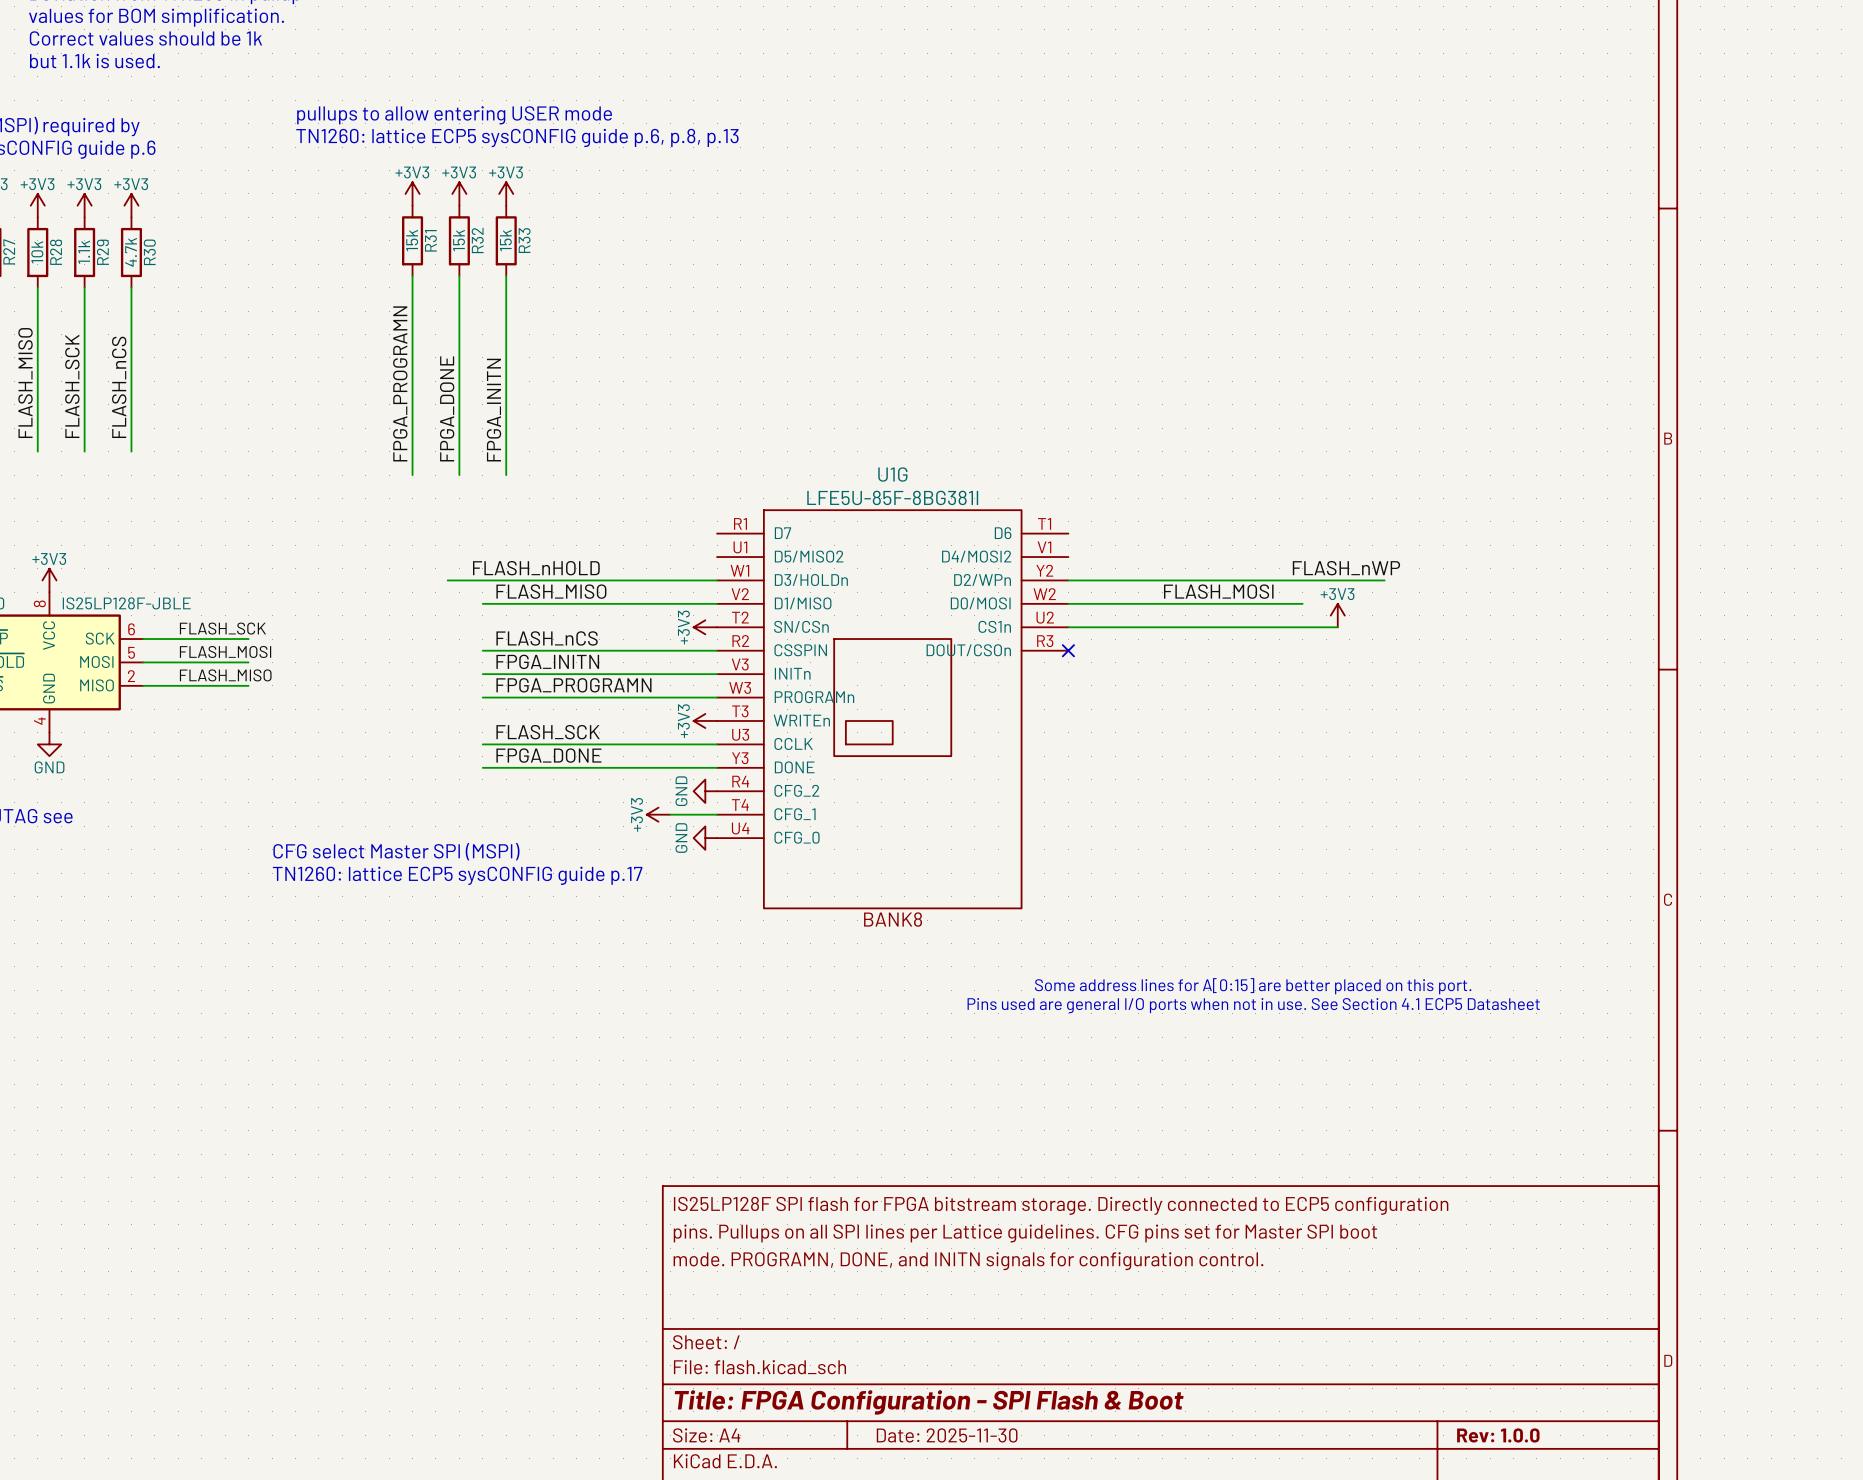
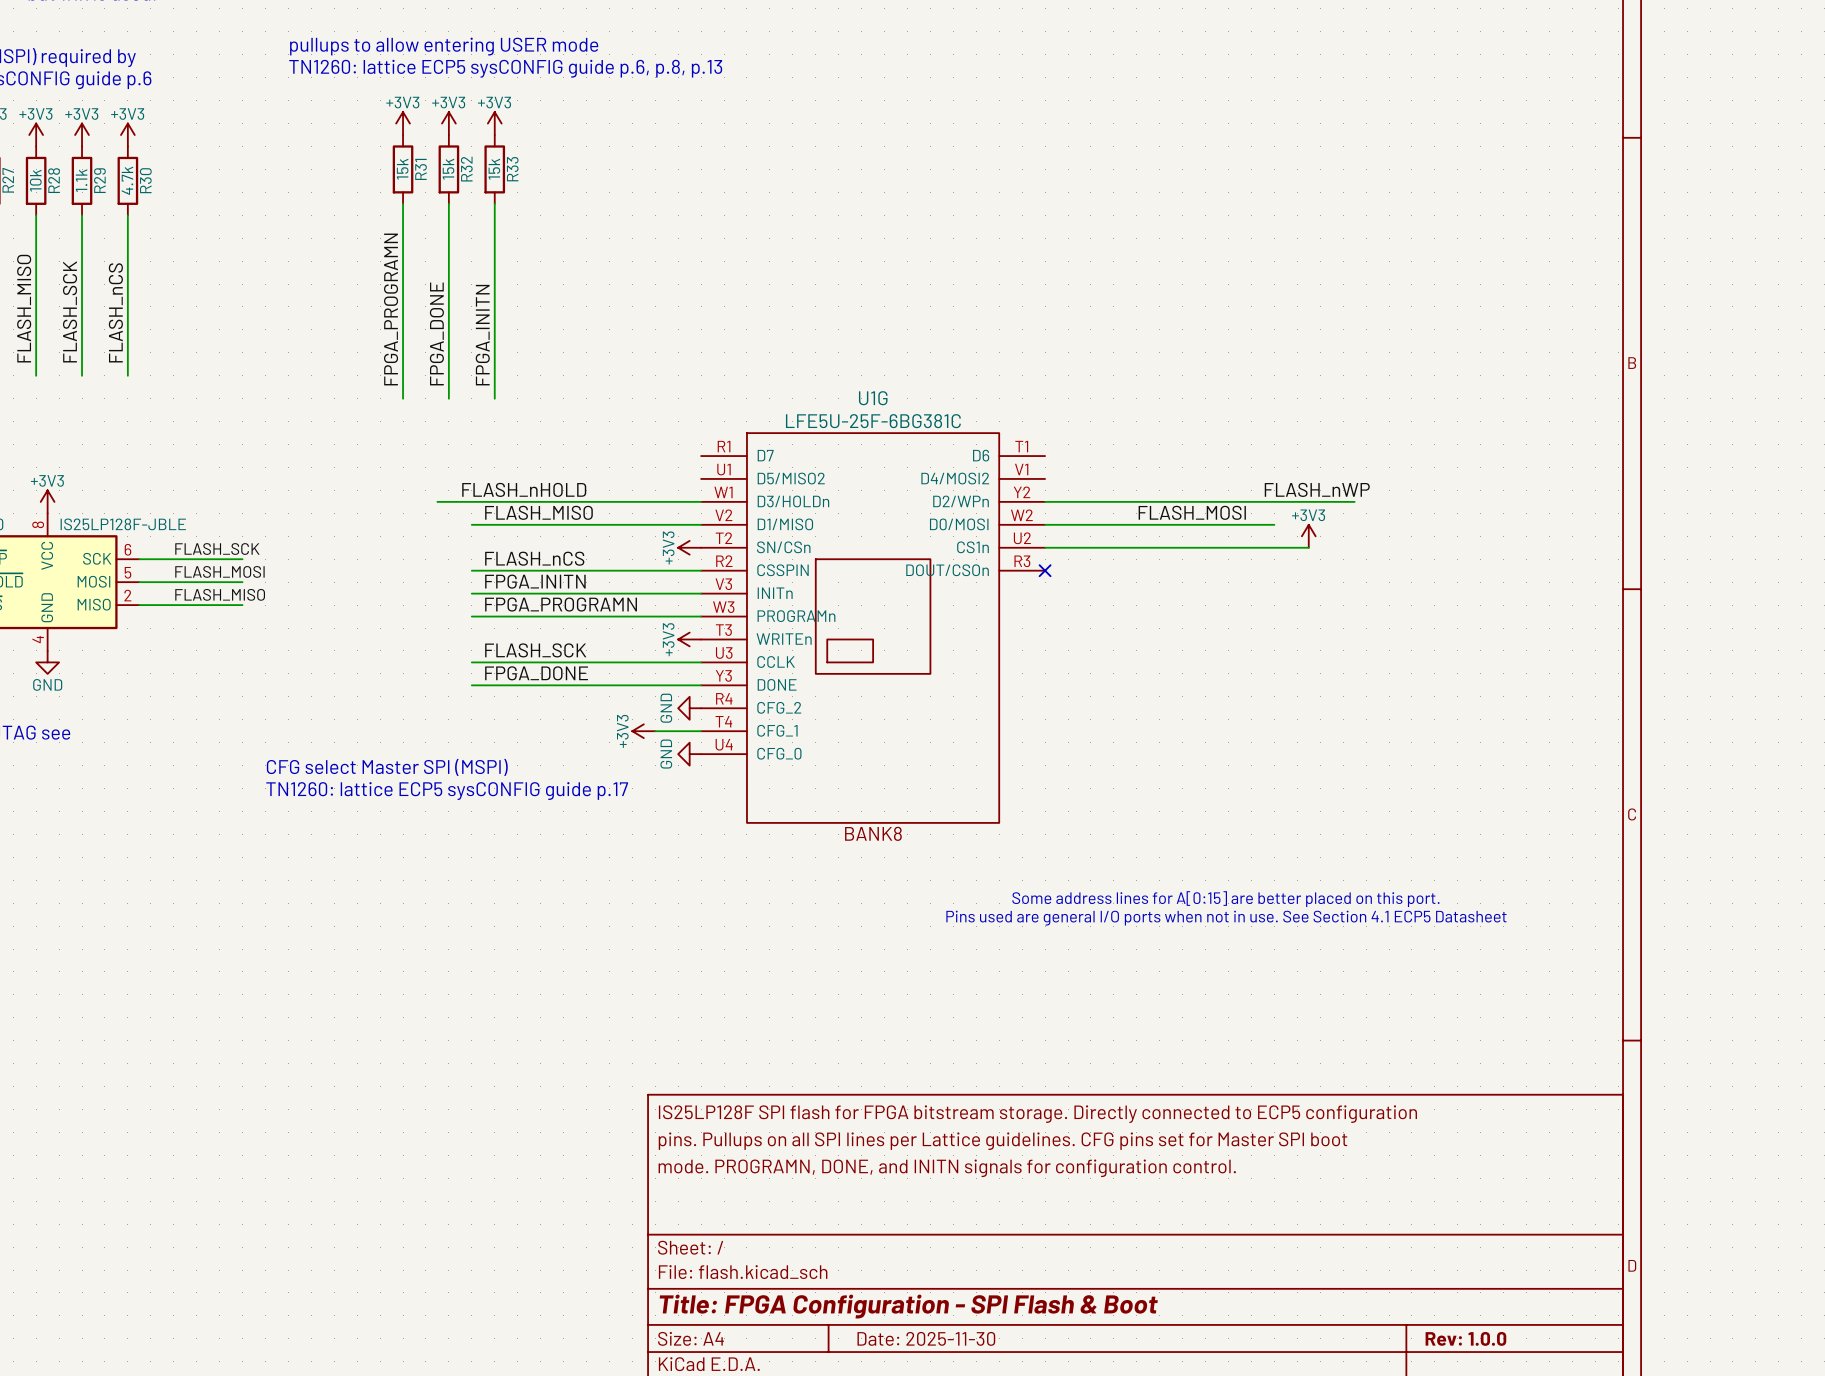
U1G value: LFE5U-85F-8BG381I (892, 497) -> LFE5U-25F-6BG381C (873, 421)

